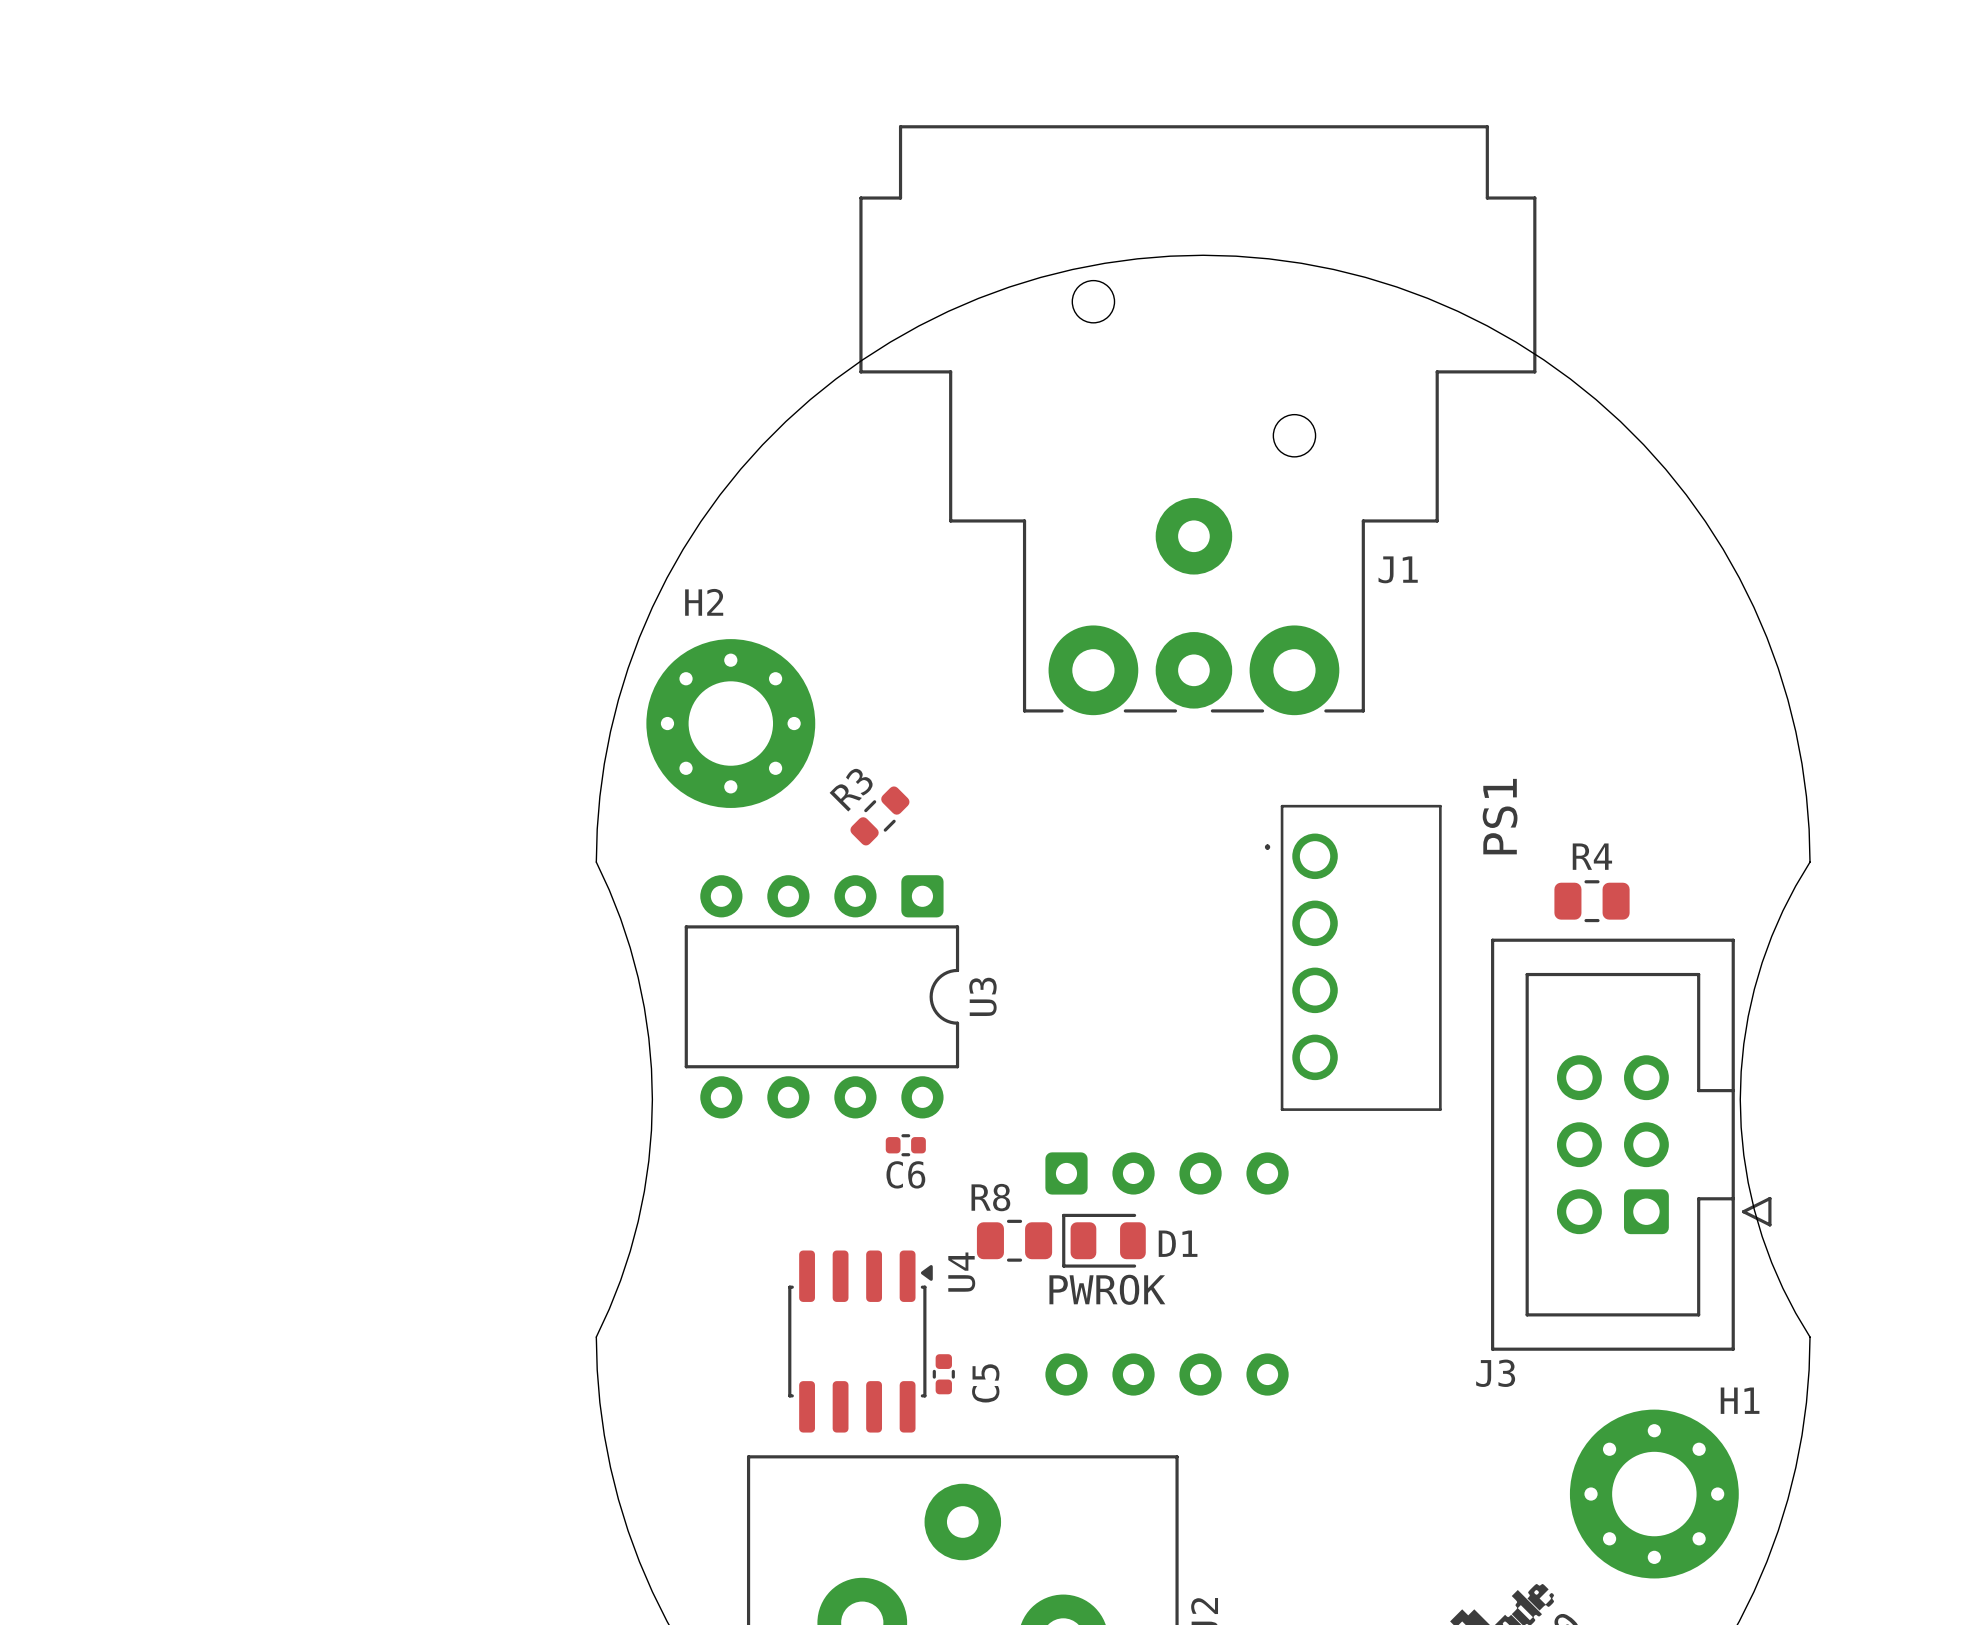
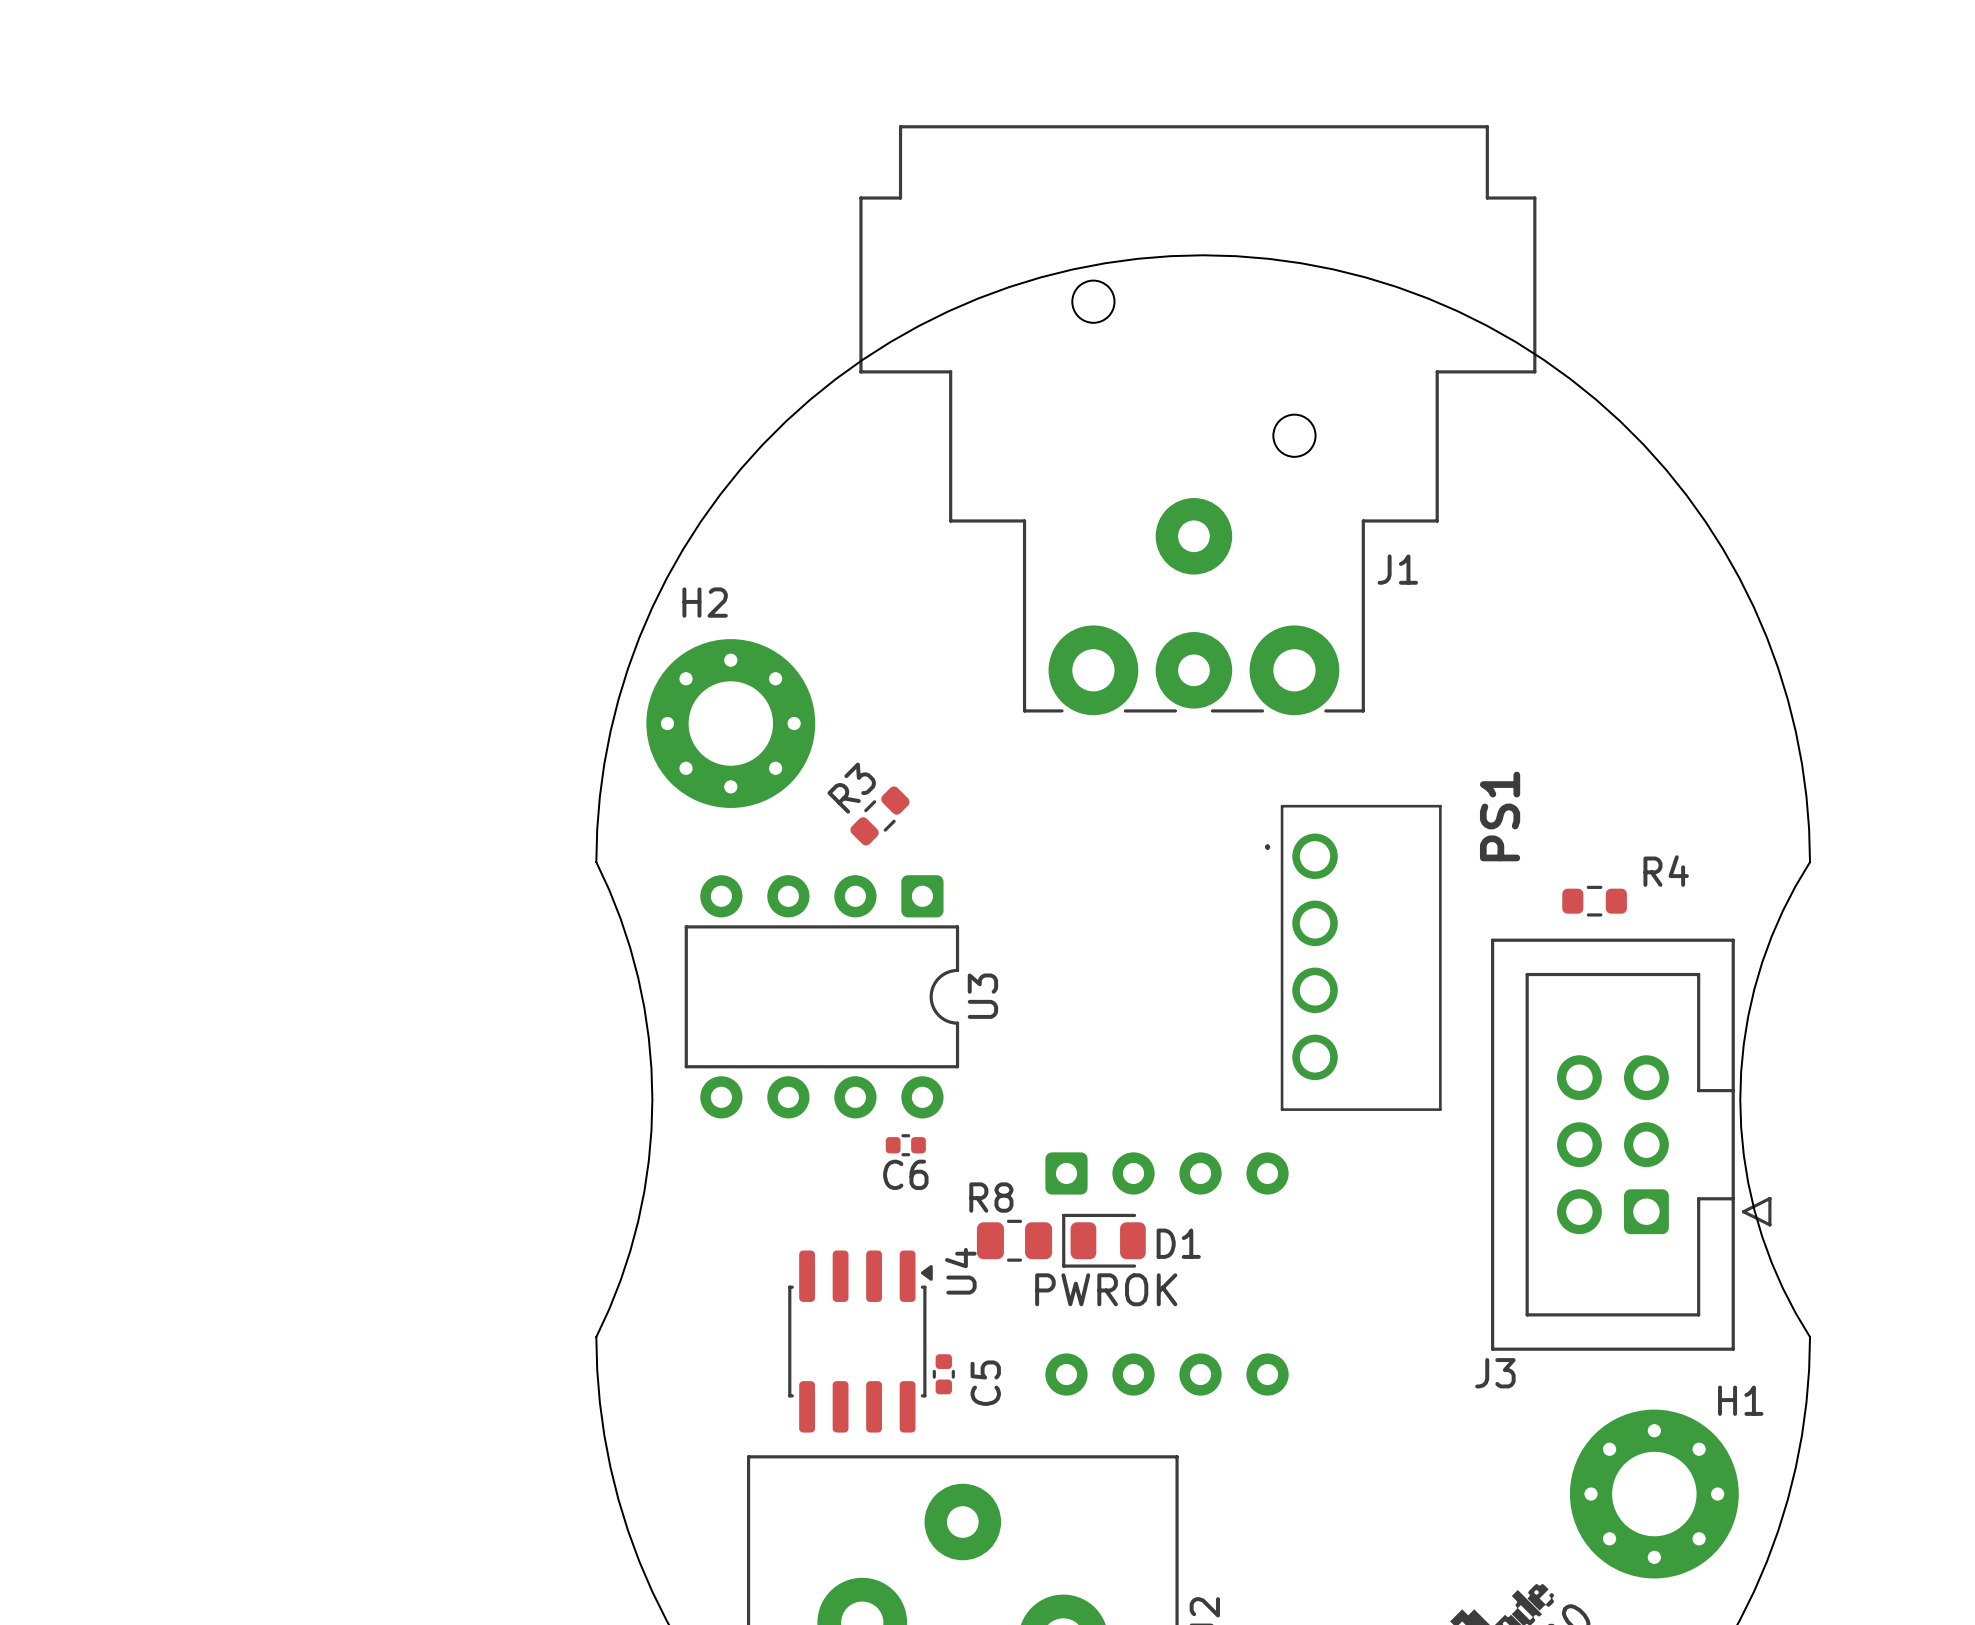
R4 name position: R4 (1592, 856) -> R4 (1666, 871)
R4 footprint: [1554, 880, 1630, 923] -> [1562, 885, 1627, 917]

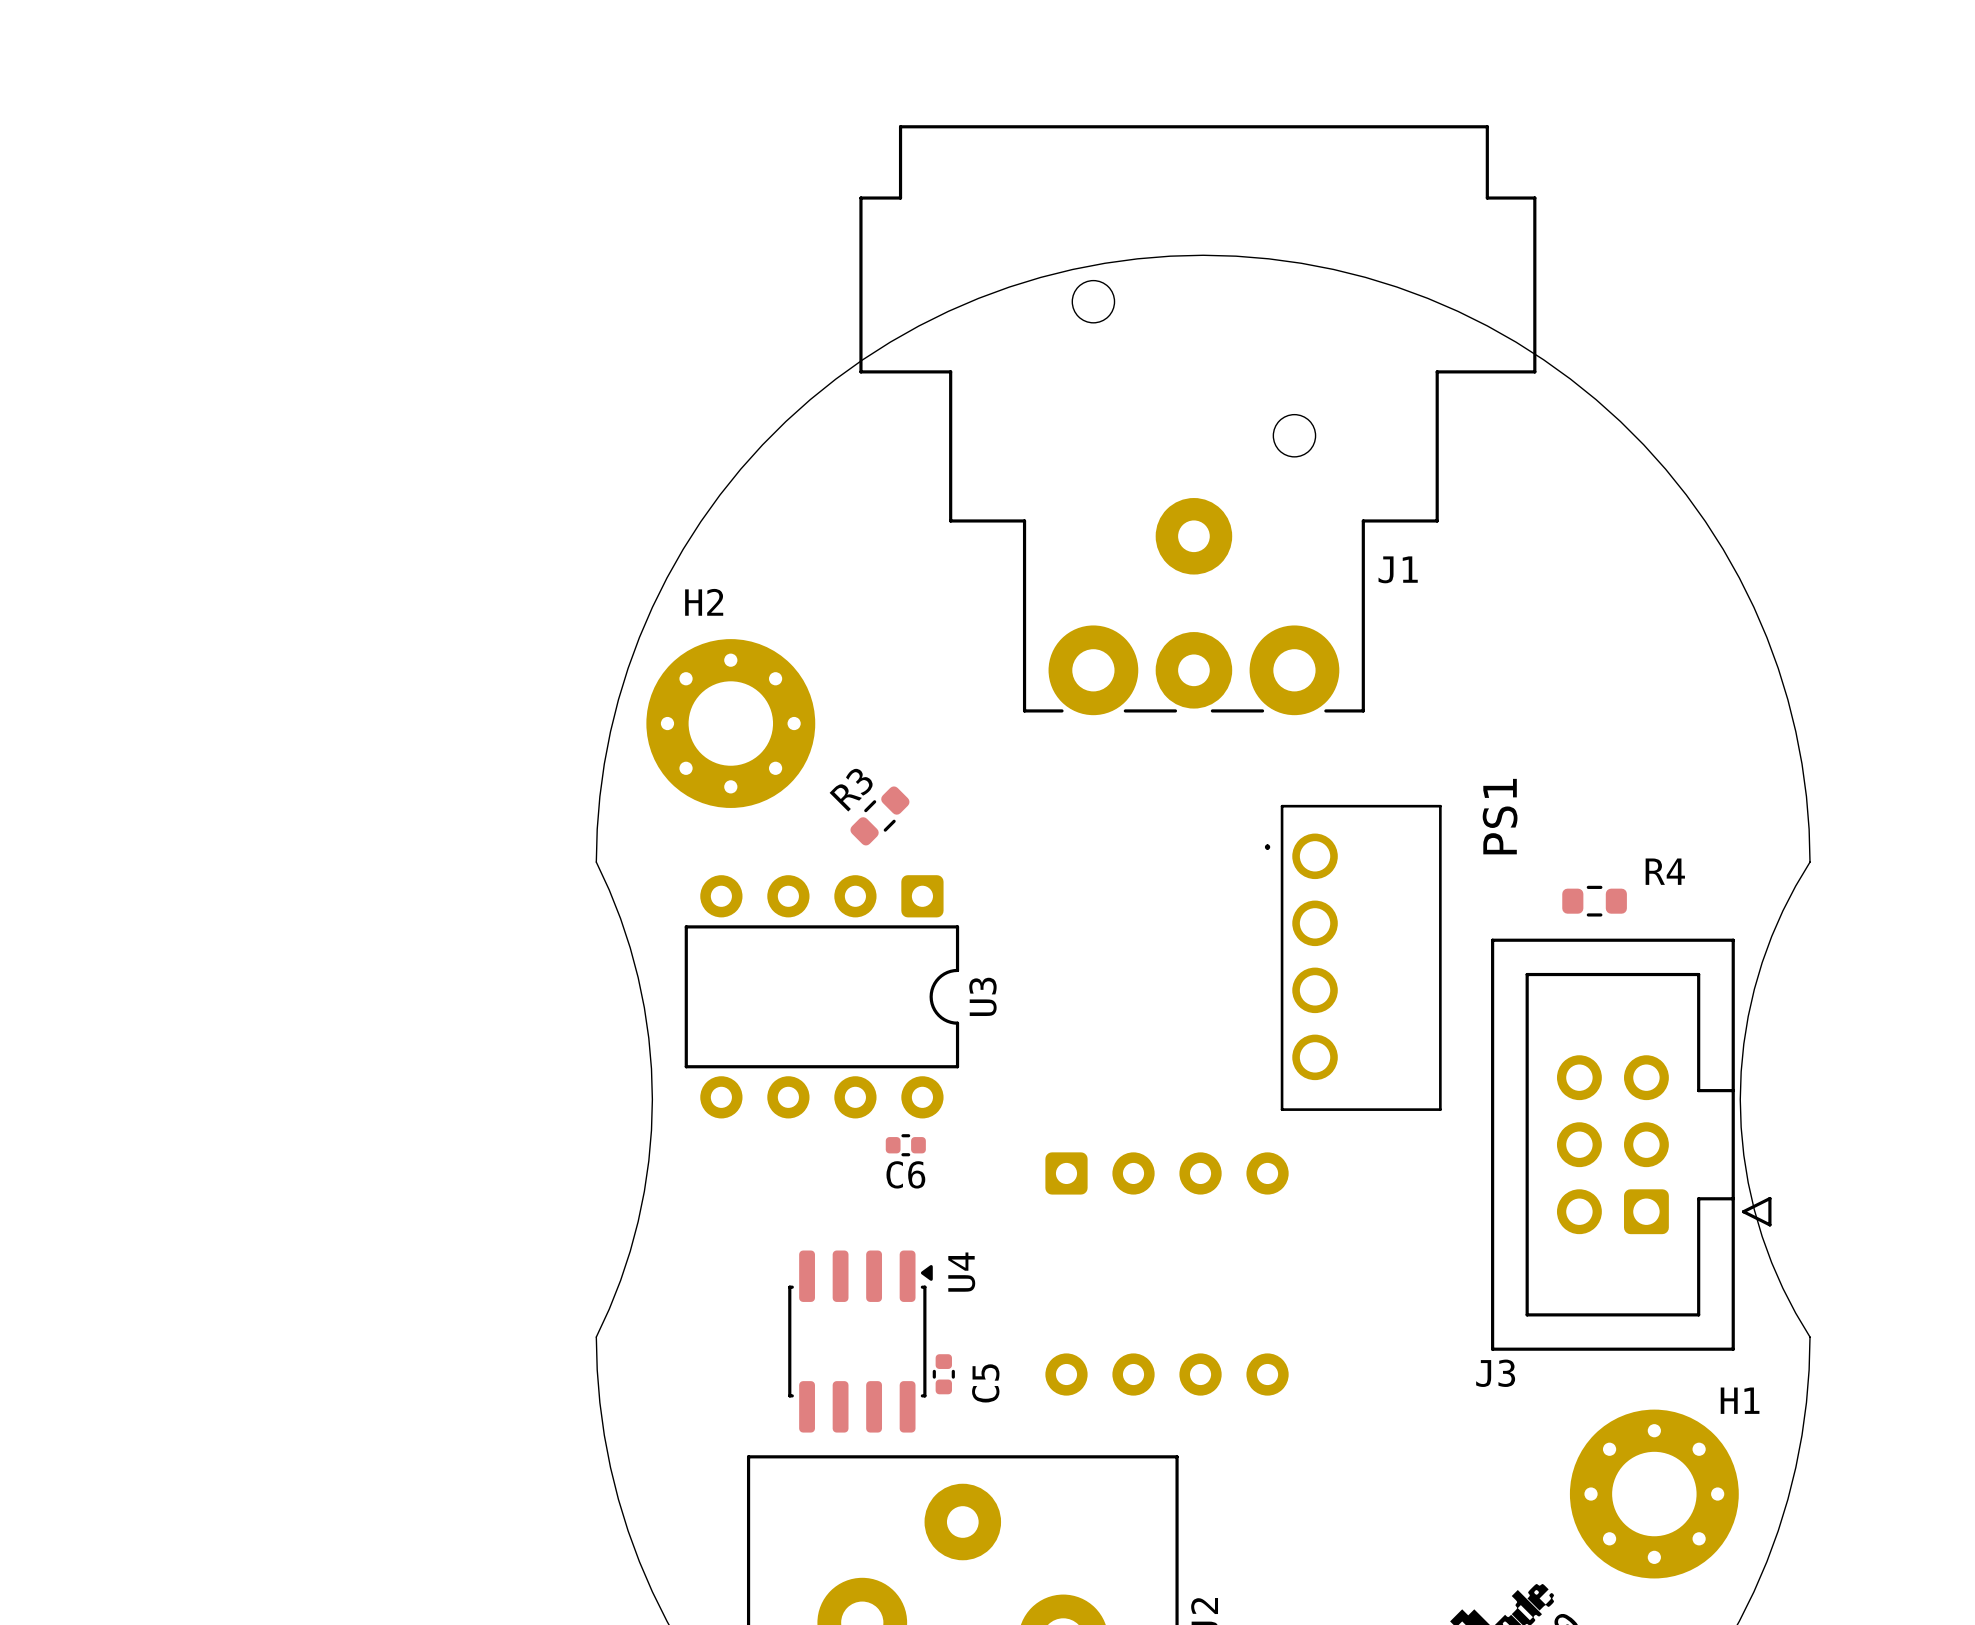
R8: (1014, 1240) -> none
D1: (1103, 1240) -> none
text: PWROK (1106, 1289) -> none

